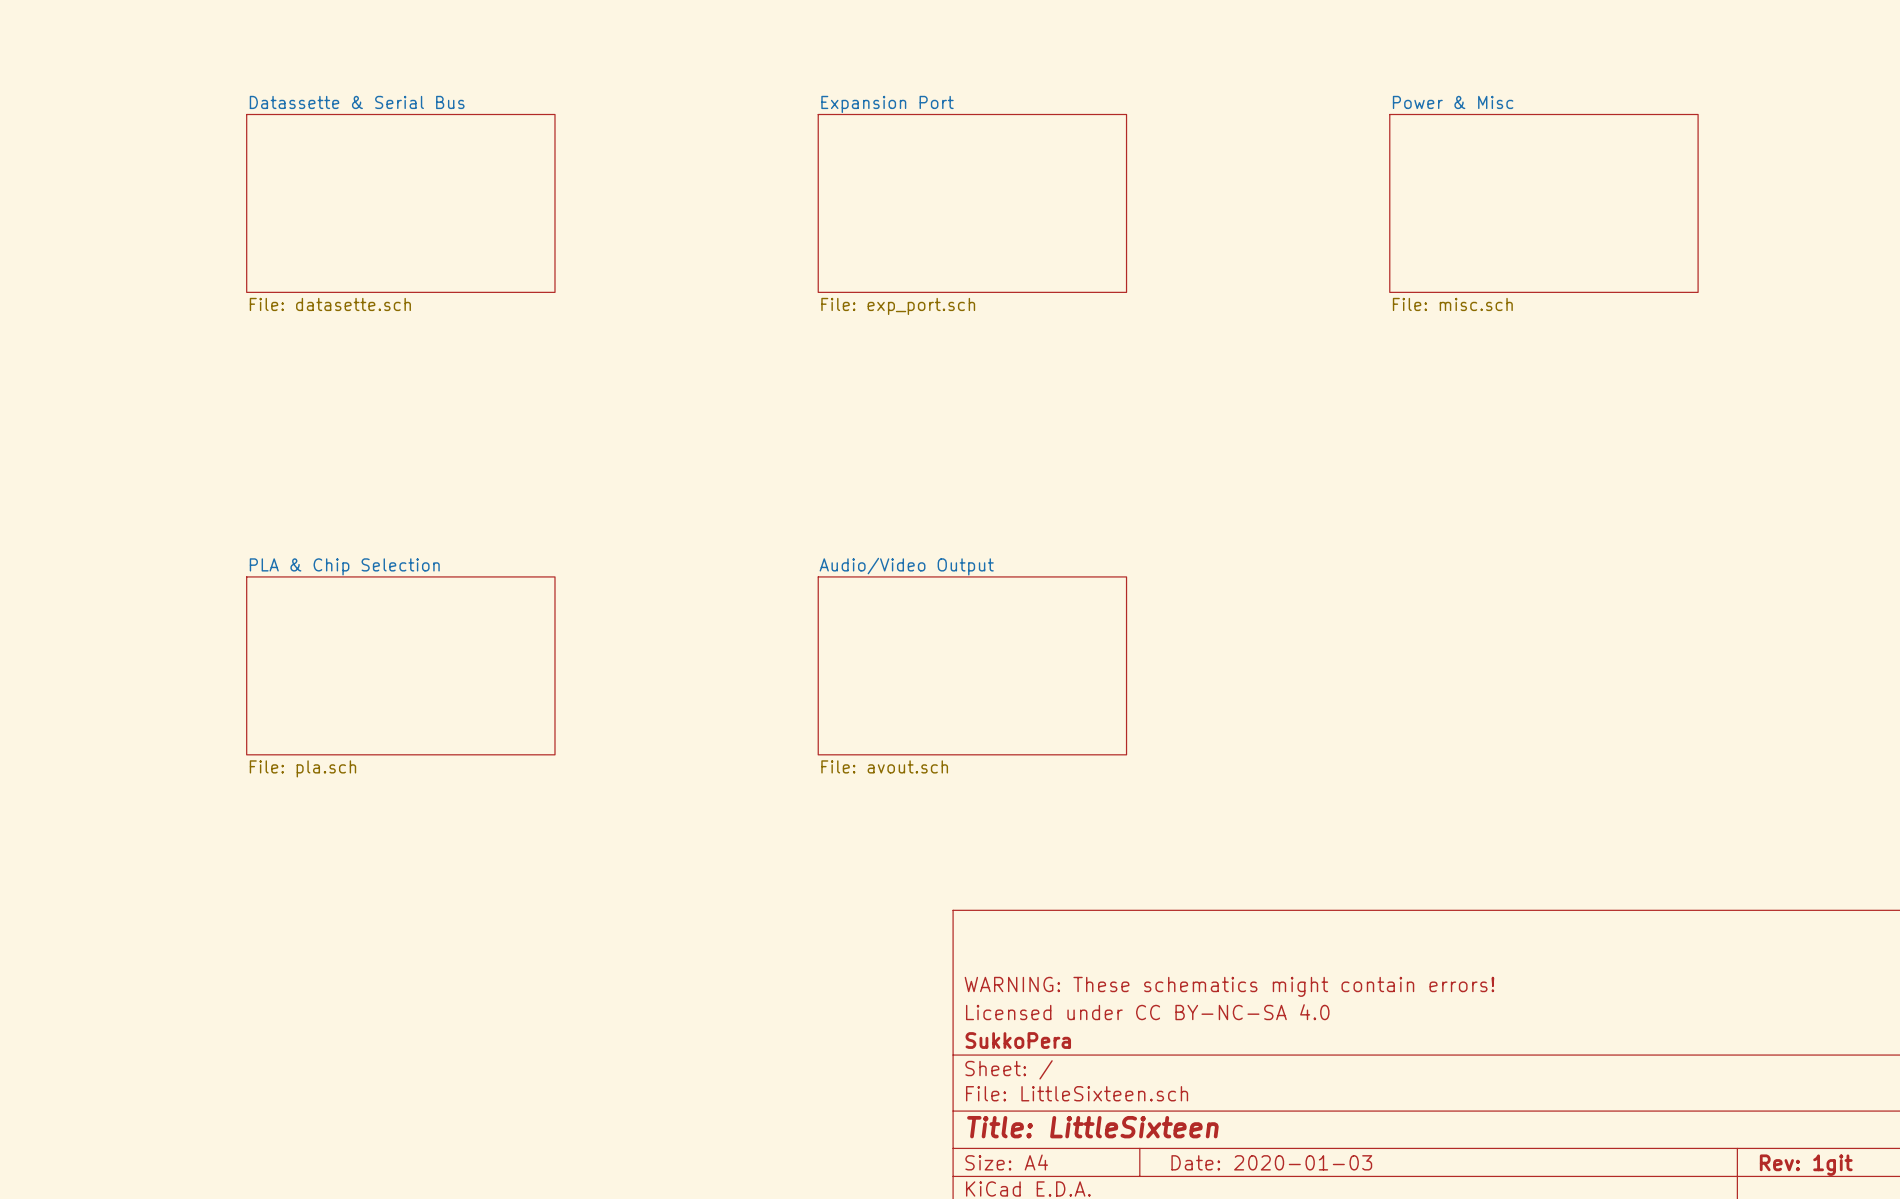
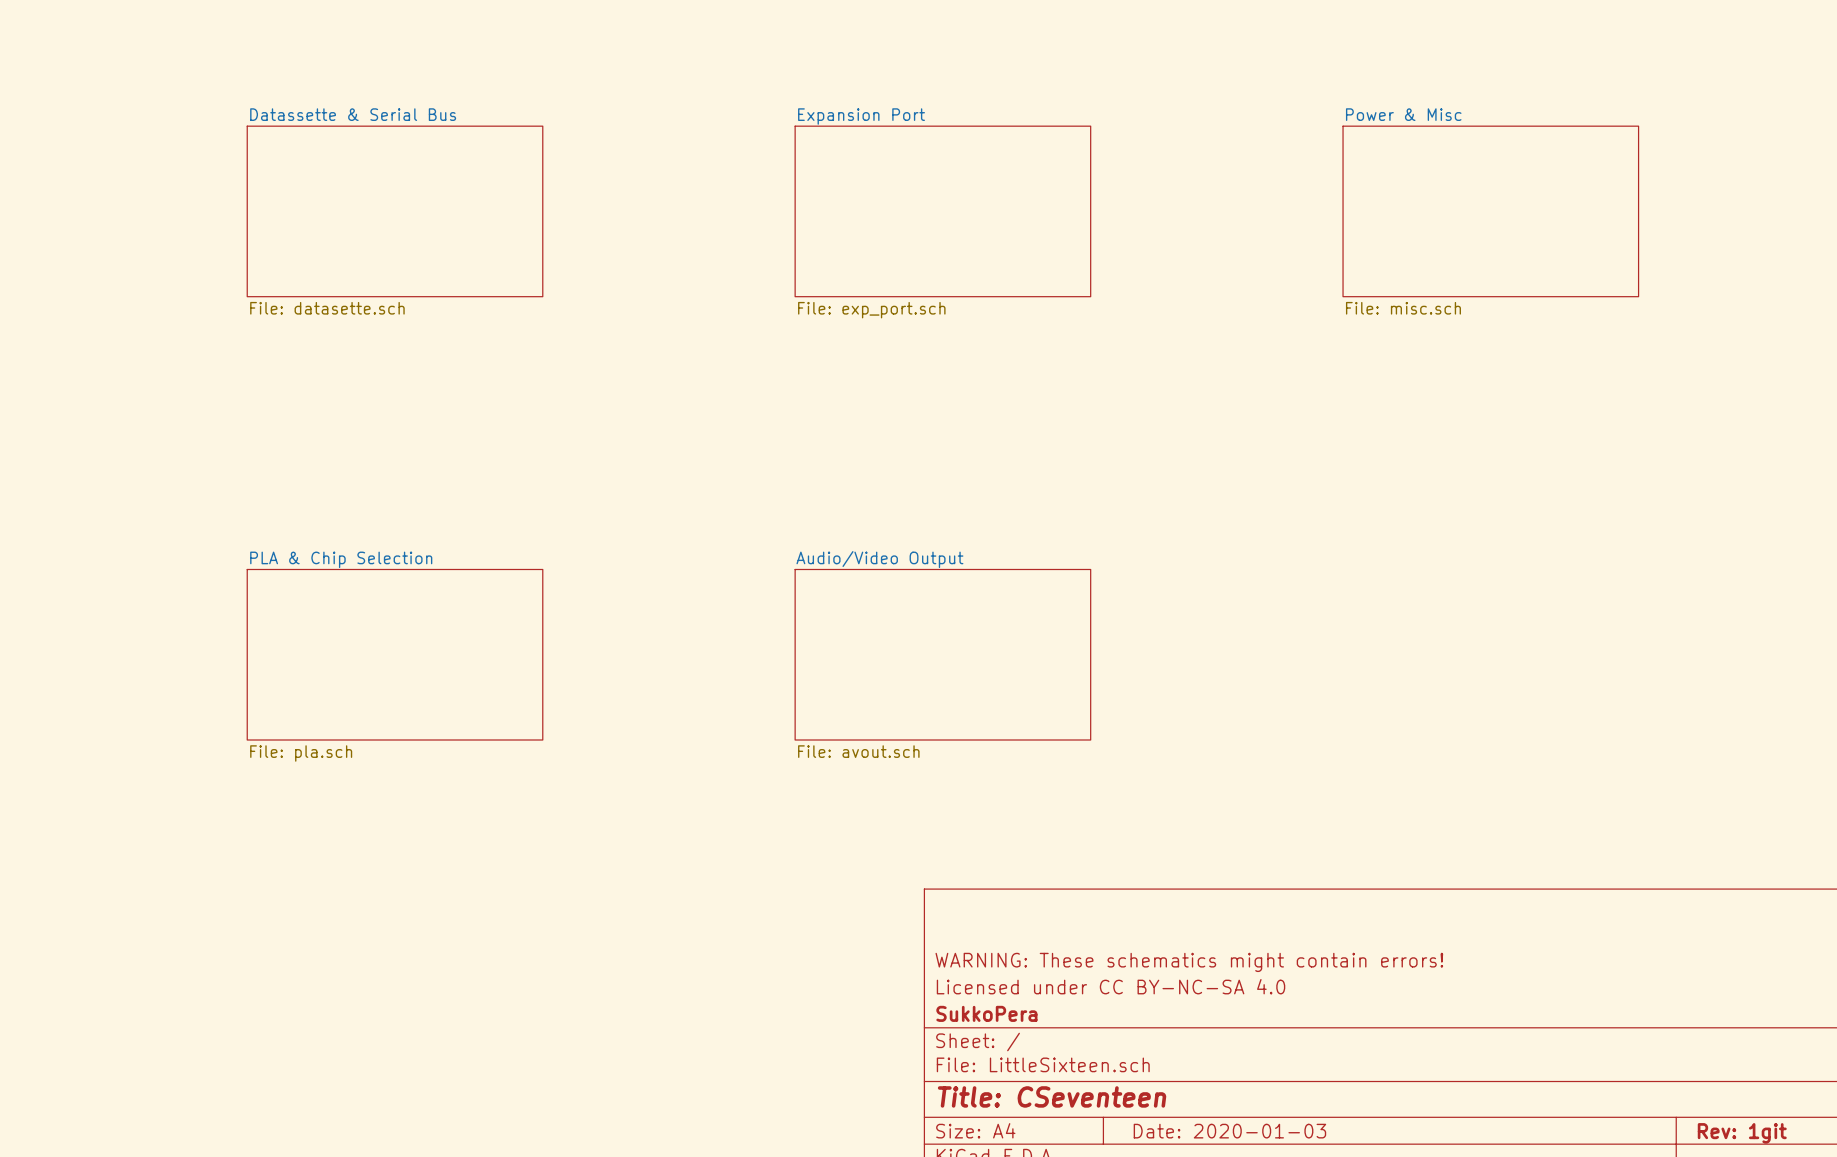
title block: Title: LittleSixteen (1092, 1127) -> Title: CSeventeen (1052, 1096)

